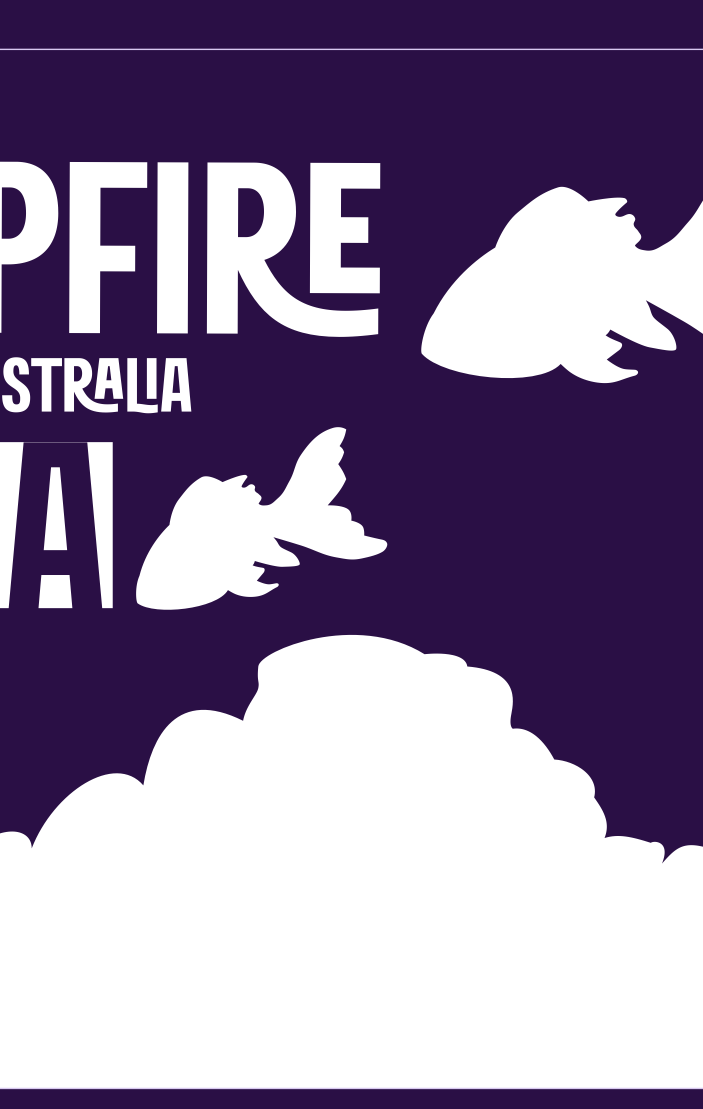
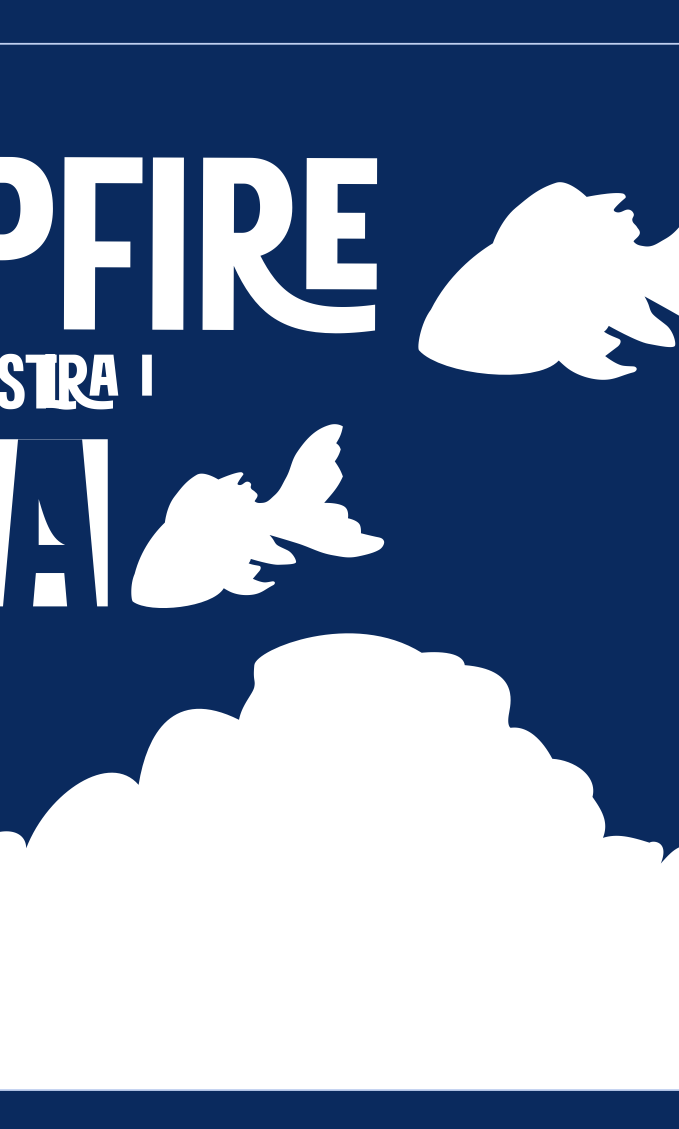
drawing: [161, 358, 192, 412] -> none
drawing position: (142, 385) -> (60, 381)
drawing shape: [43, 467, 68, 551] -> [38, 499, 66, 545]

